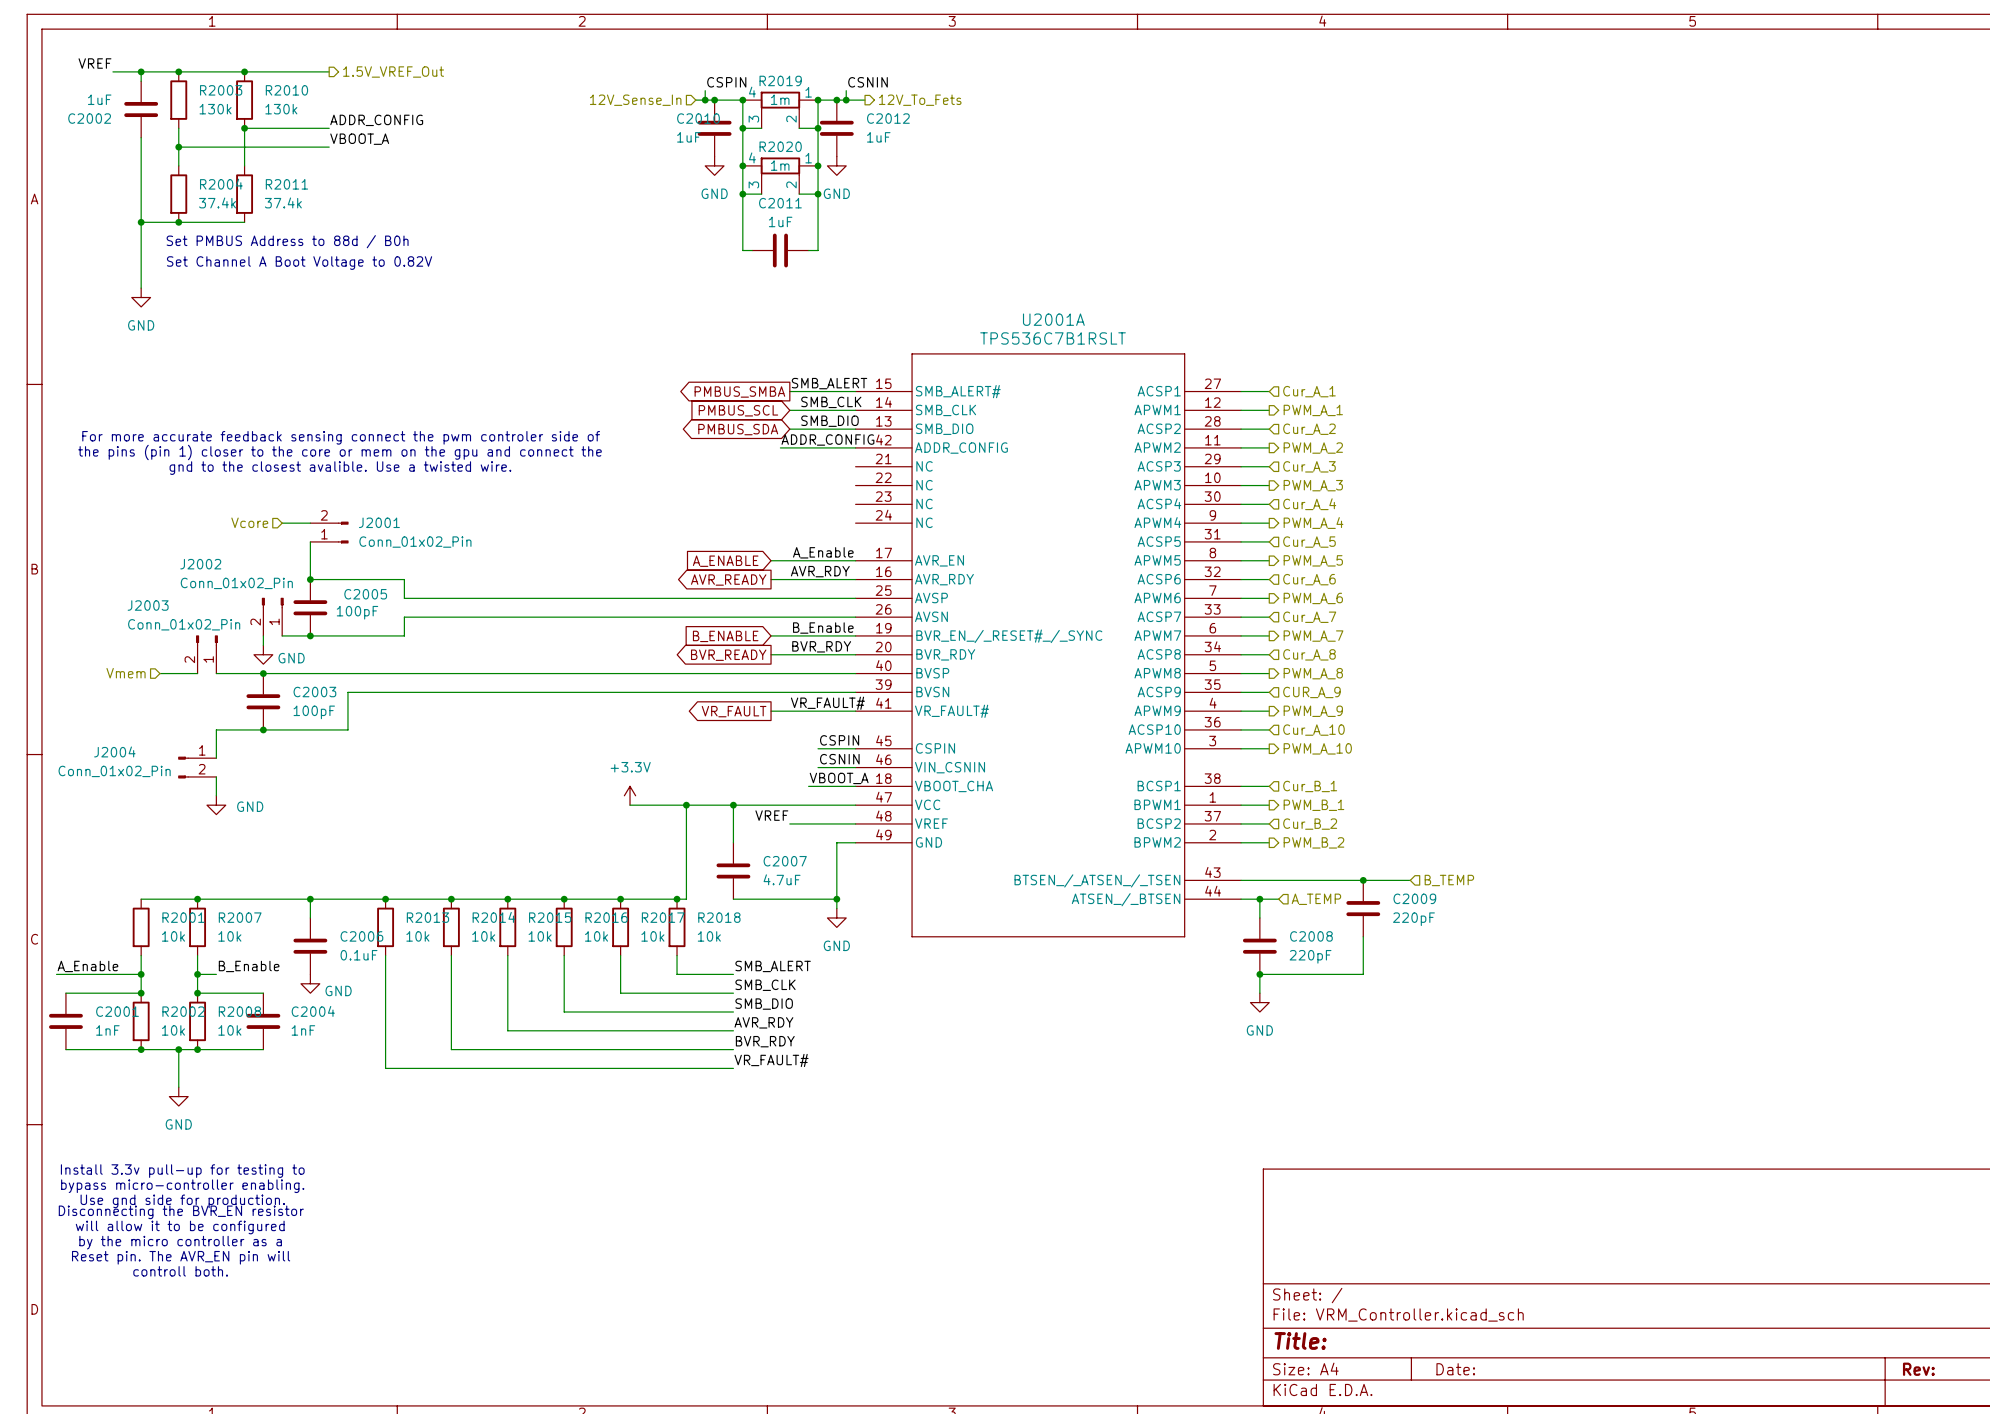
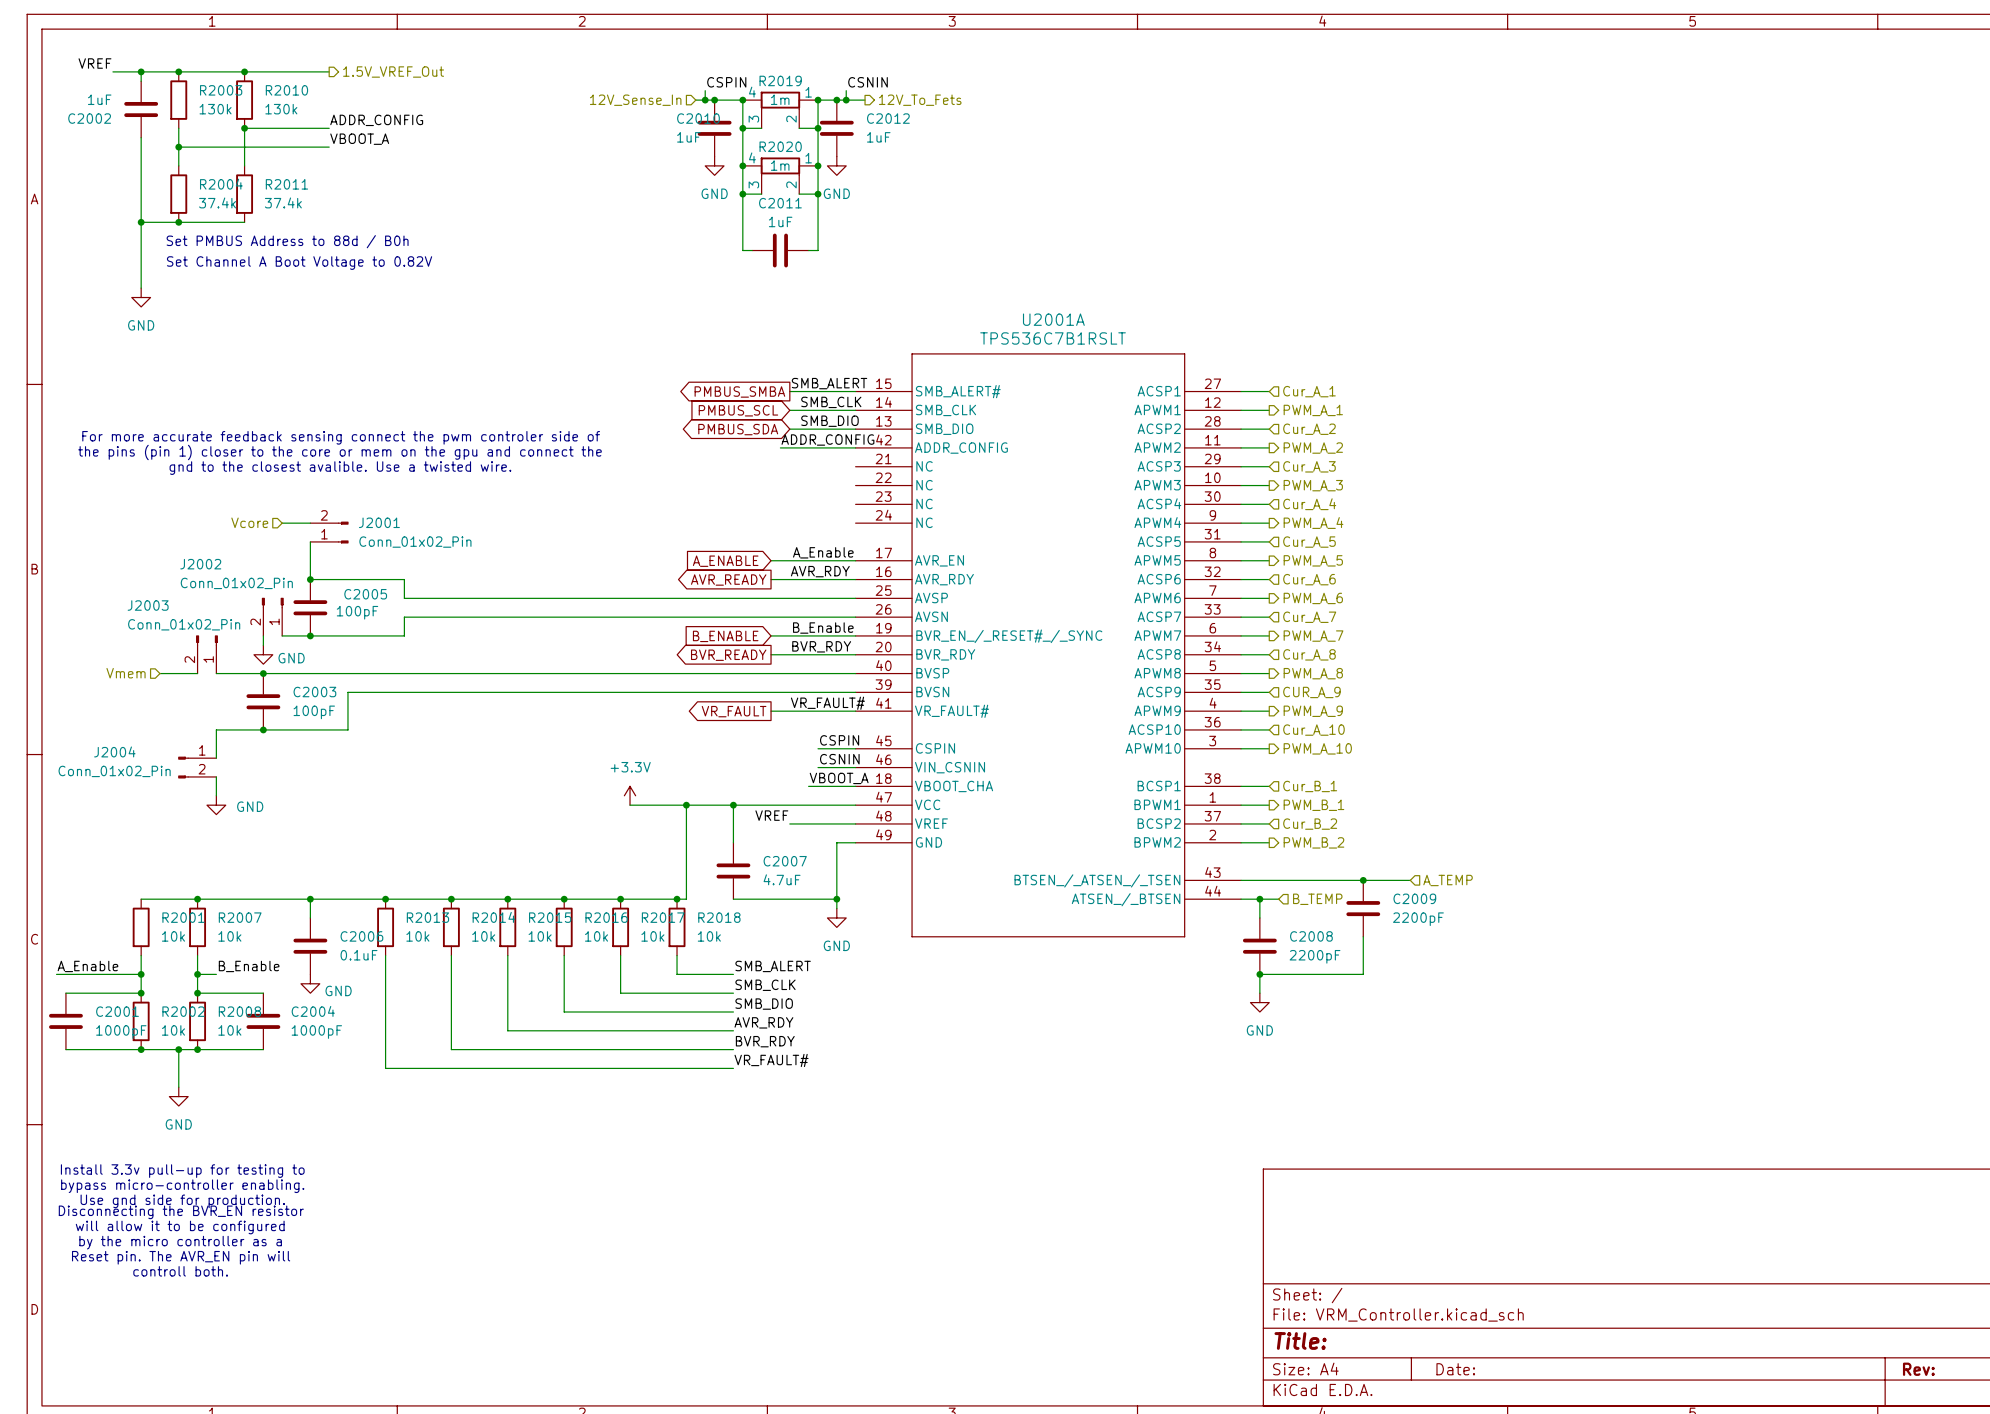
hierarchical label: B_TEMP (1449, 880) -> A_TEMP (1448, 880)
hierarchical label: A_TEMP (1316, 899) -> B_TEMP (1317, 899)
C2009 value: 220pF (1413, 919) -> 2200pF (1418, 919)
C2008 value: 220pF (1310, 956) -> 2200pF (1315, 956)
C2001 value: 1nF (107, 1030) -> 1000pF (121, 1032)
C2004 value: 1nF (303, 1030) -> 1000pF (316, 1032)

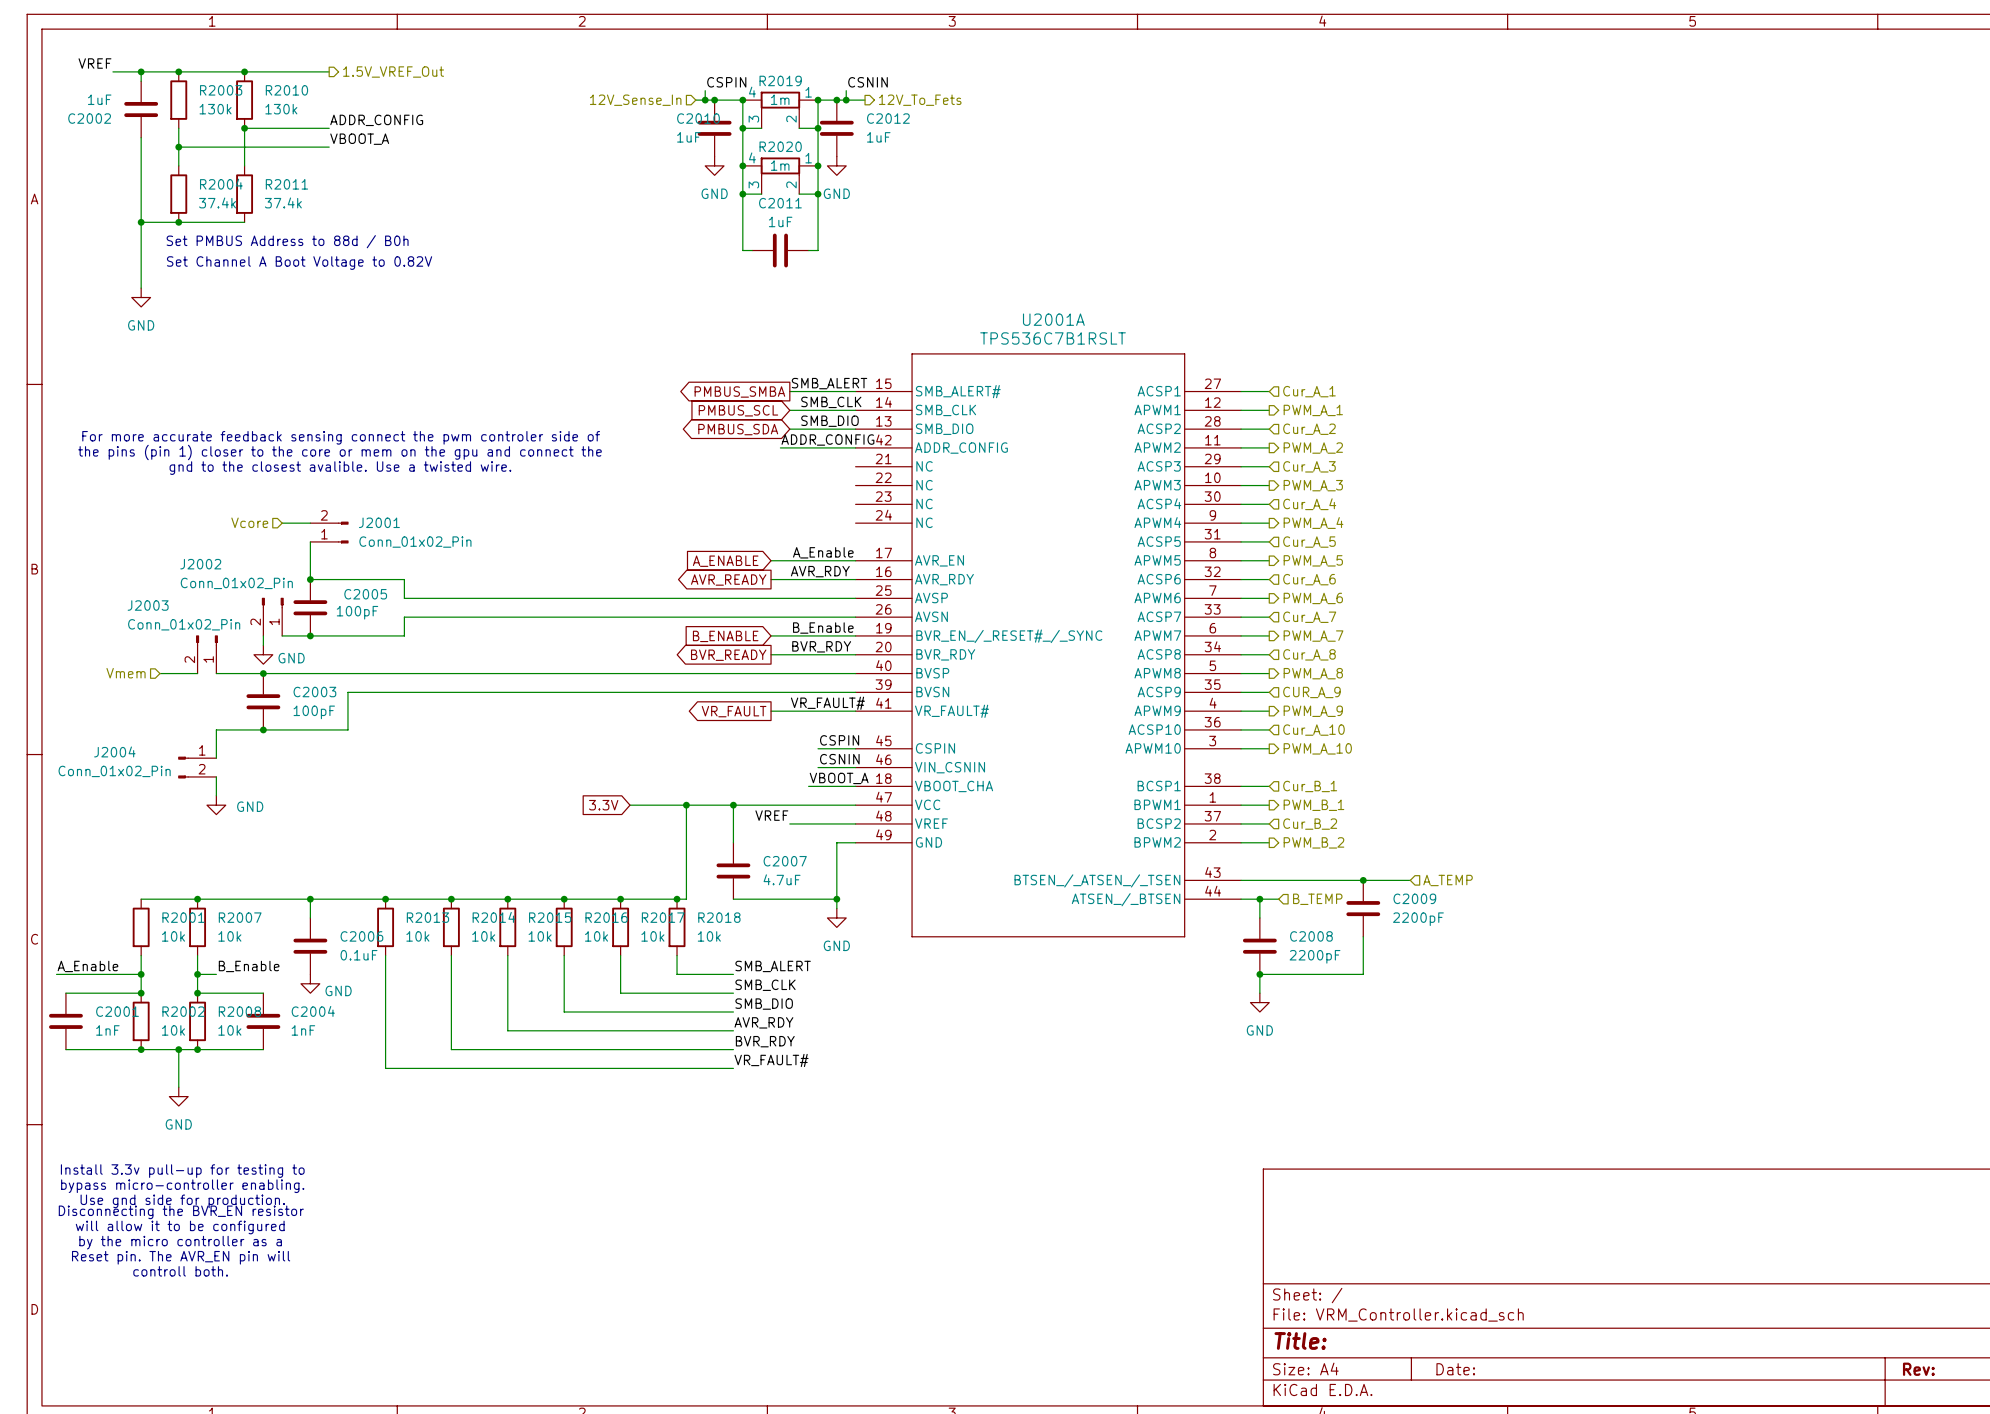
power symbol: +3.3V (630, 795) -> none
global label: none -> 3.3V (603, 805)
C2001 value: 1000pF (121, 1032) -> 1nF (107, 1030)
C2004 value: 1000pF (316, 1032) -> 1nF (303, 1030)

